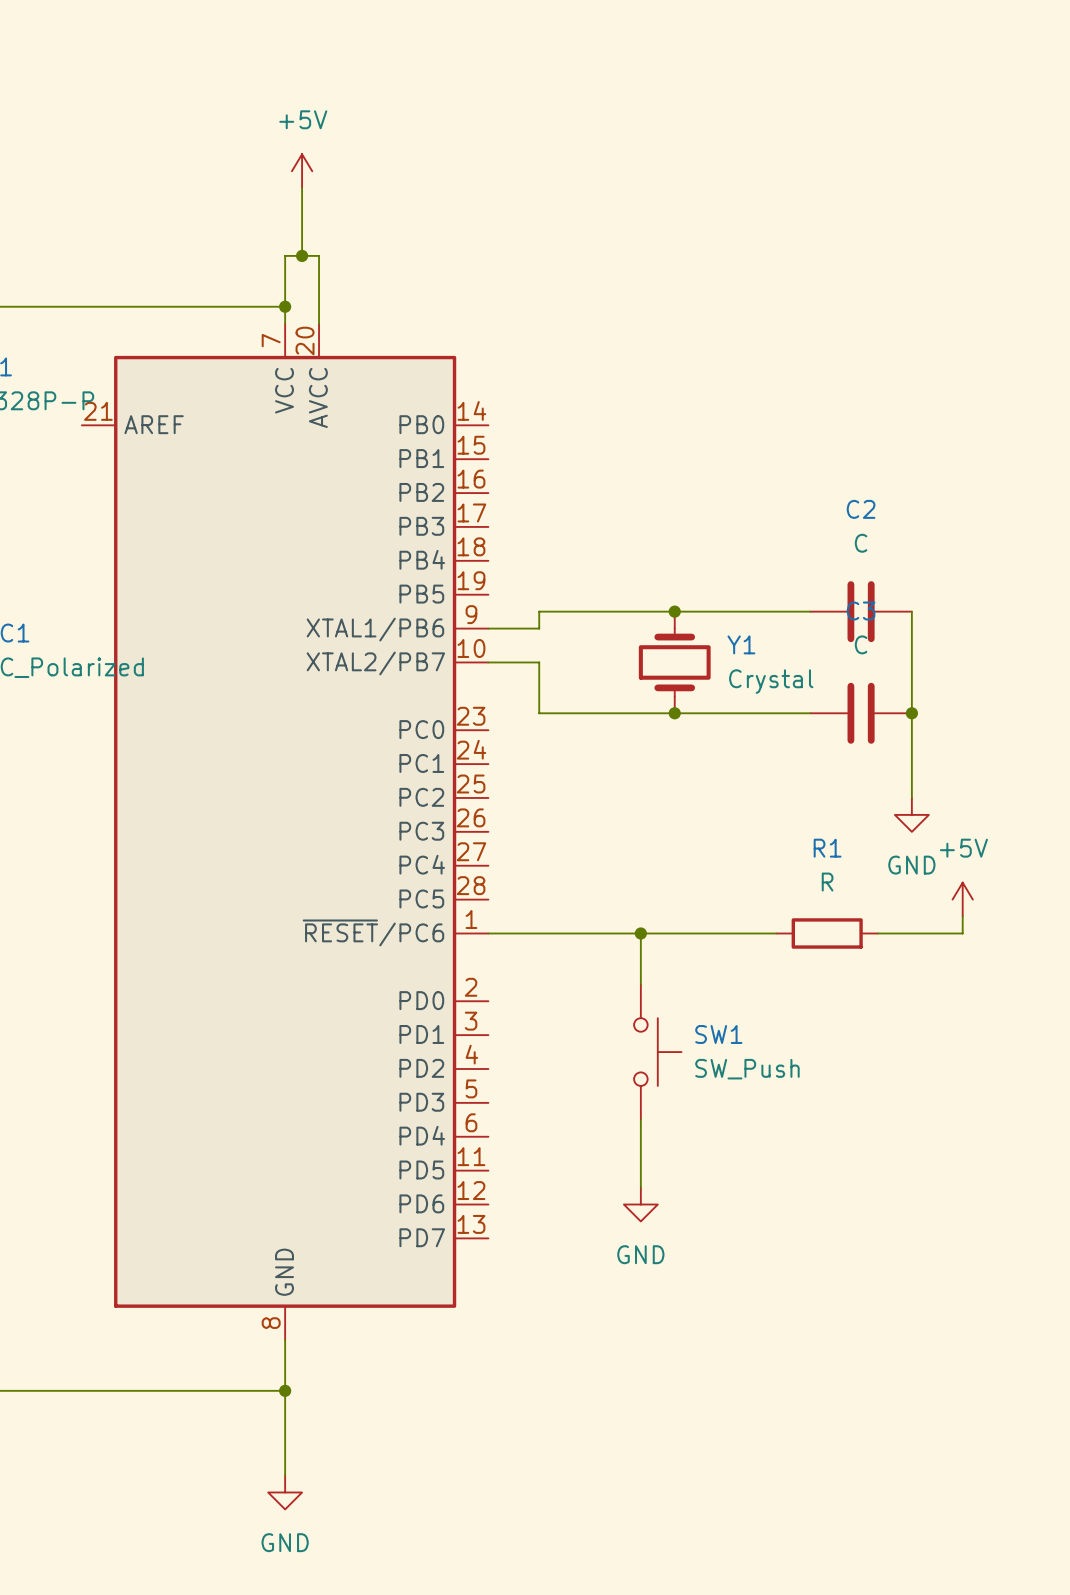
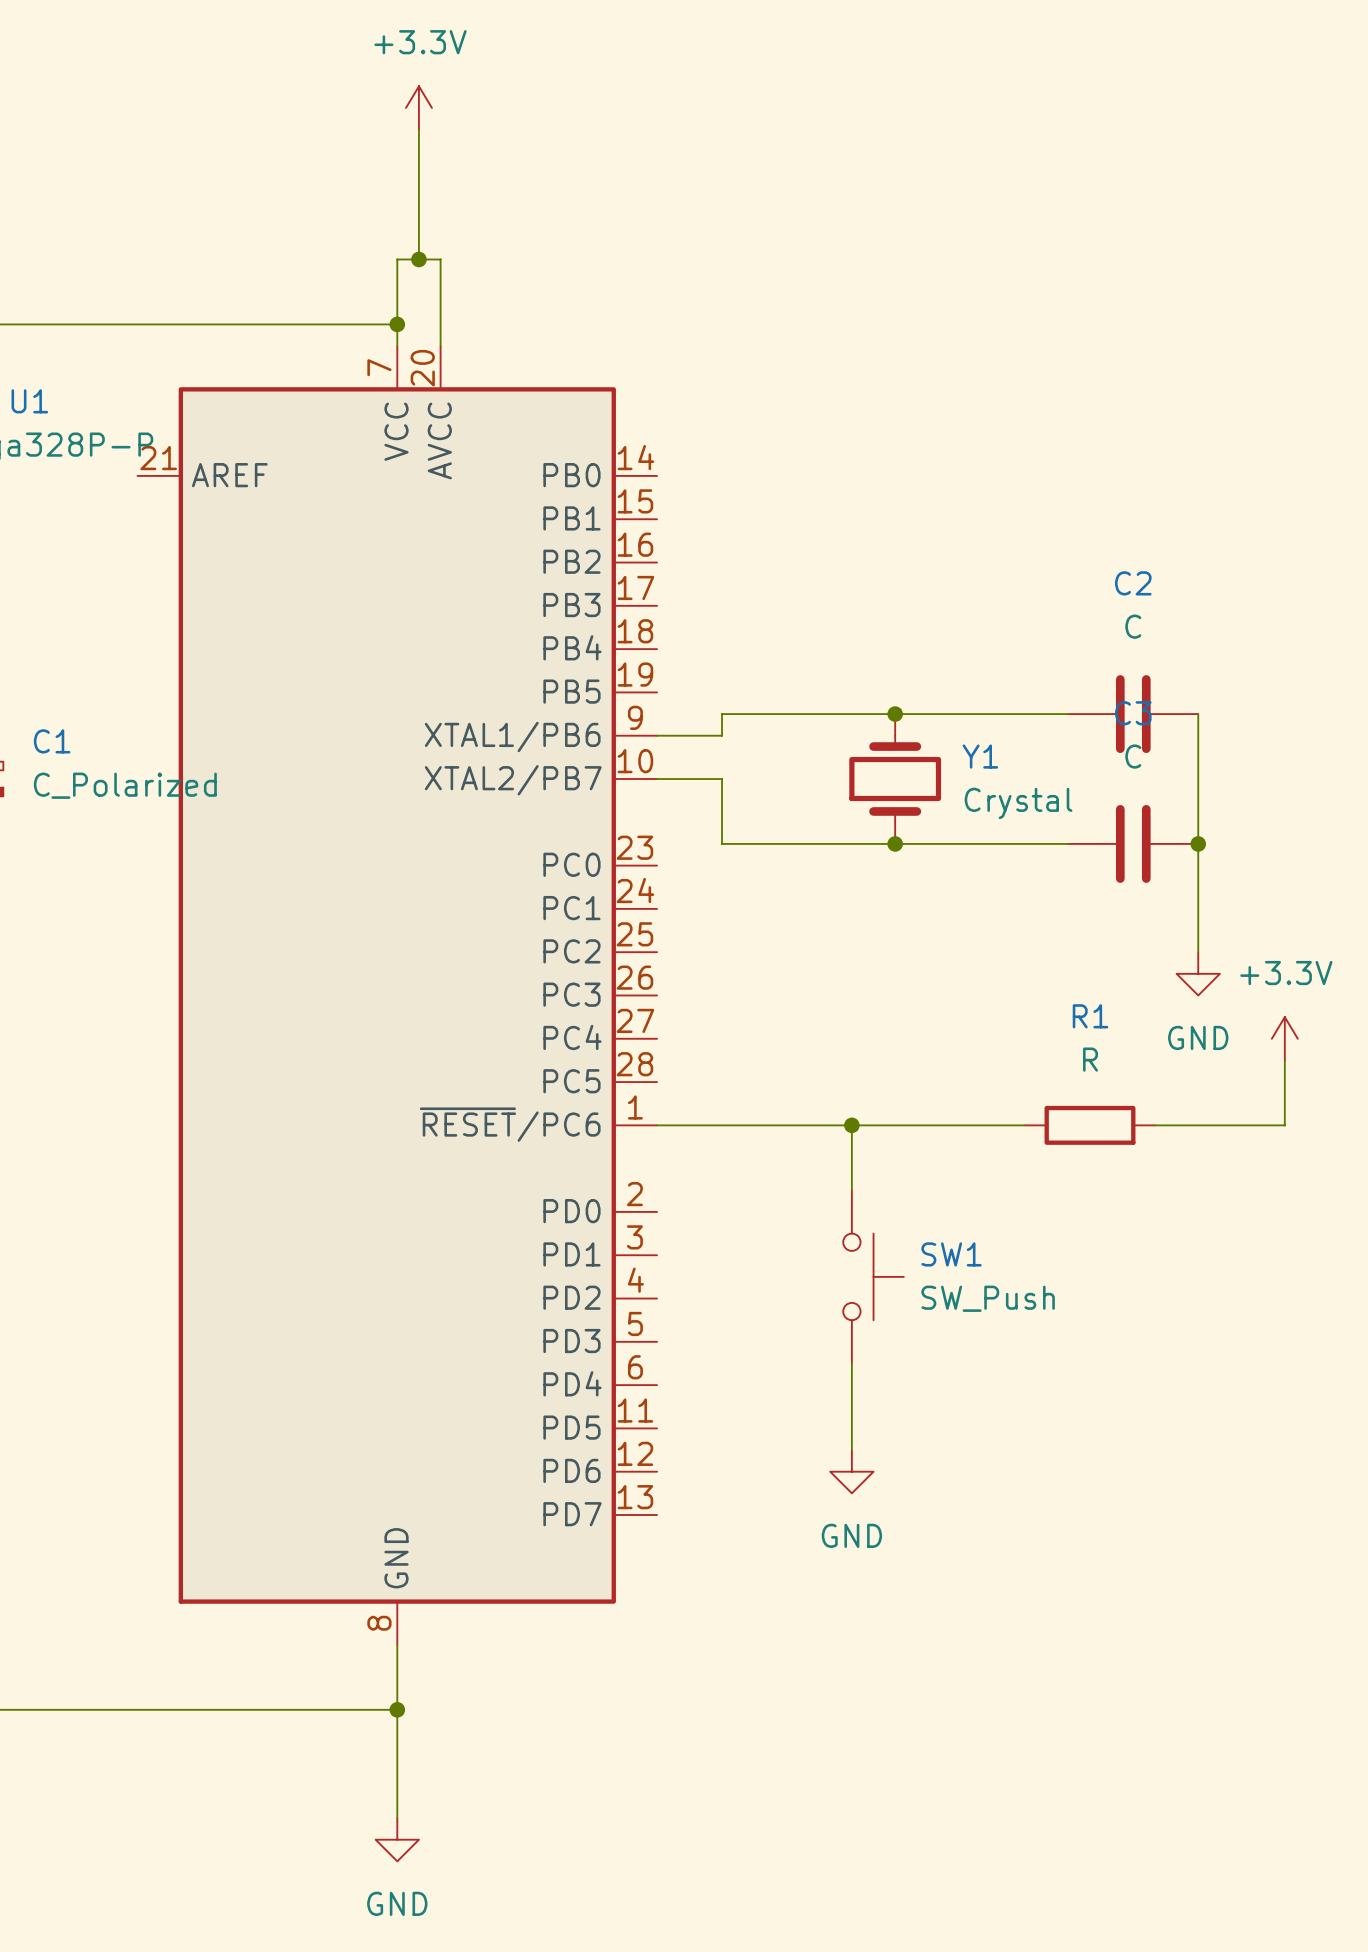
power symbol: none -> +3.3V (418, 107)
power symbol: +5V (302, 171) -> none
power symbol: none -> +3.3V (1284, 1038)
power symbol: +5V (962, 899) -> none
wire: (962, 916) (962, 933) -> (1284, 1060) (1284, 1125) (1263, 1125)

